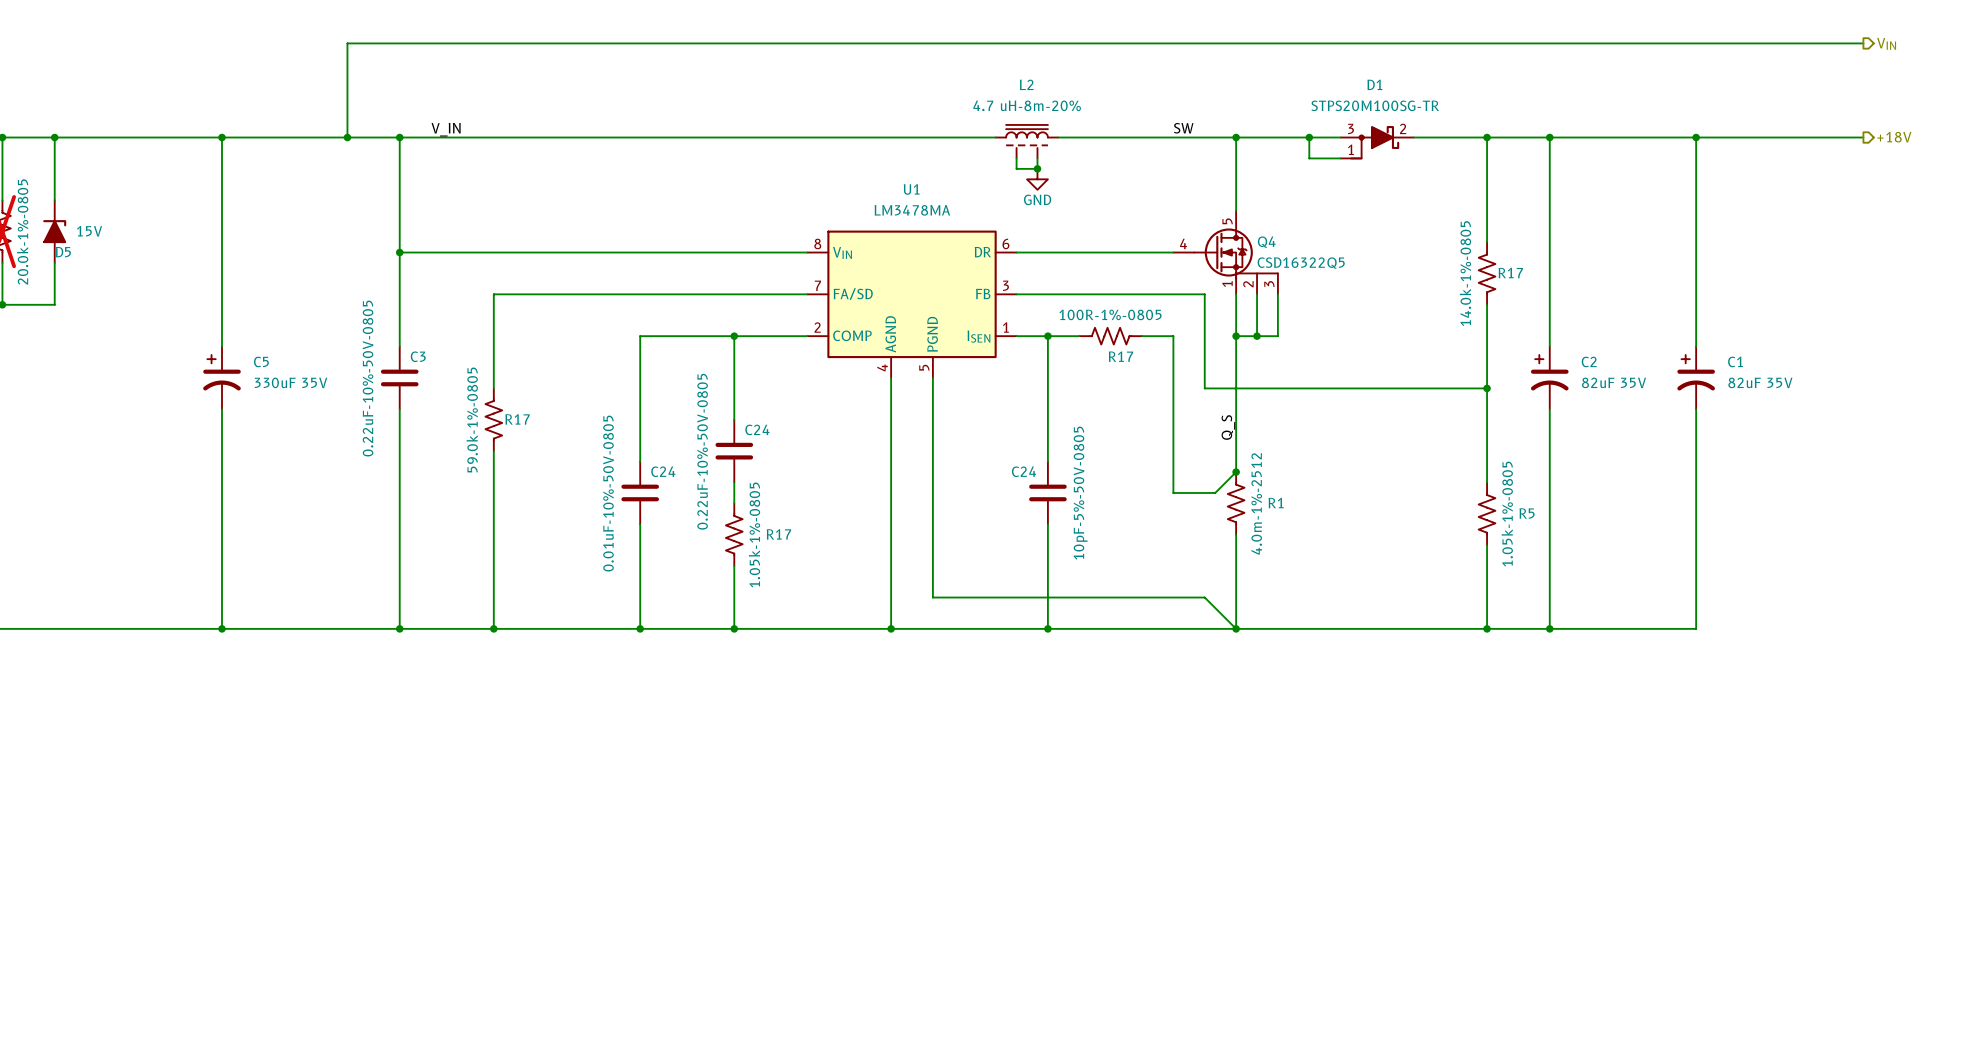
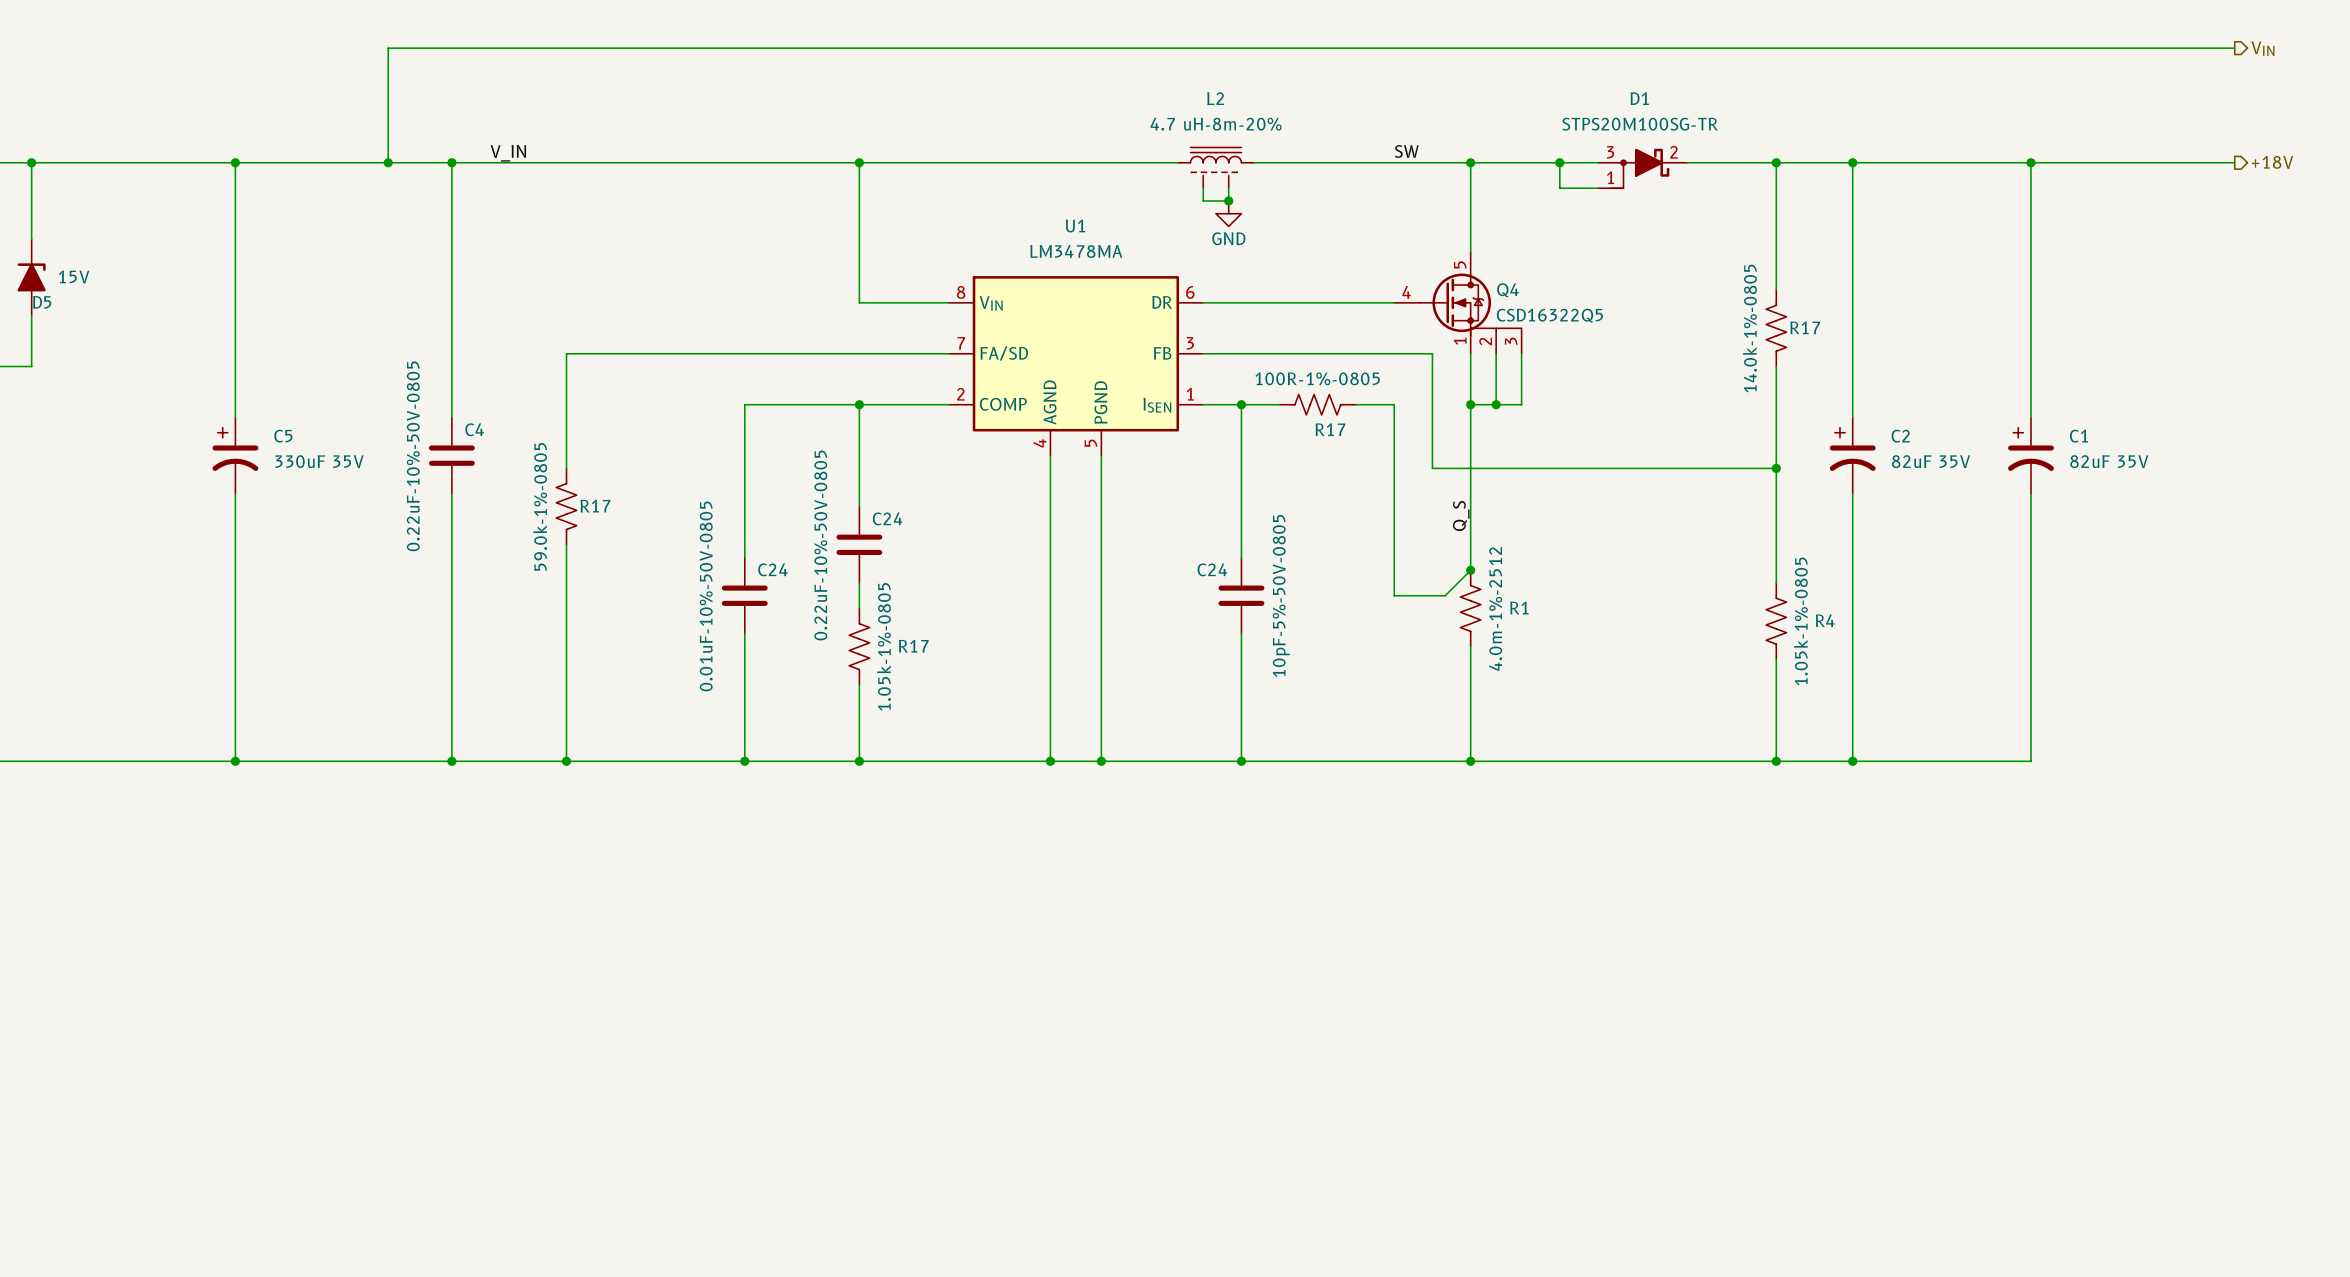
junction: none -> (859, 162)
wire: (399, 252) (734, 252) -> (859, 162) (859, 302)
junction: (399, 252) -> none
C3 name: C3 (418, 356) -> C4 (474, 429)
R5 name: R5 (1527, 513) -> R4 (1825, 620)
wire: (932, 597) (1204, 597) (1236, 628) -> (1101, 723) (1101, 761)
junction: none -> (1101, 761)

